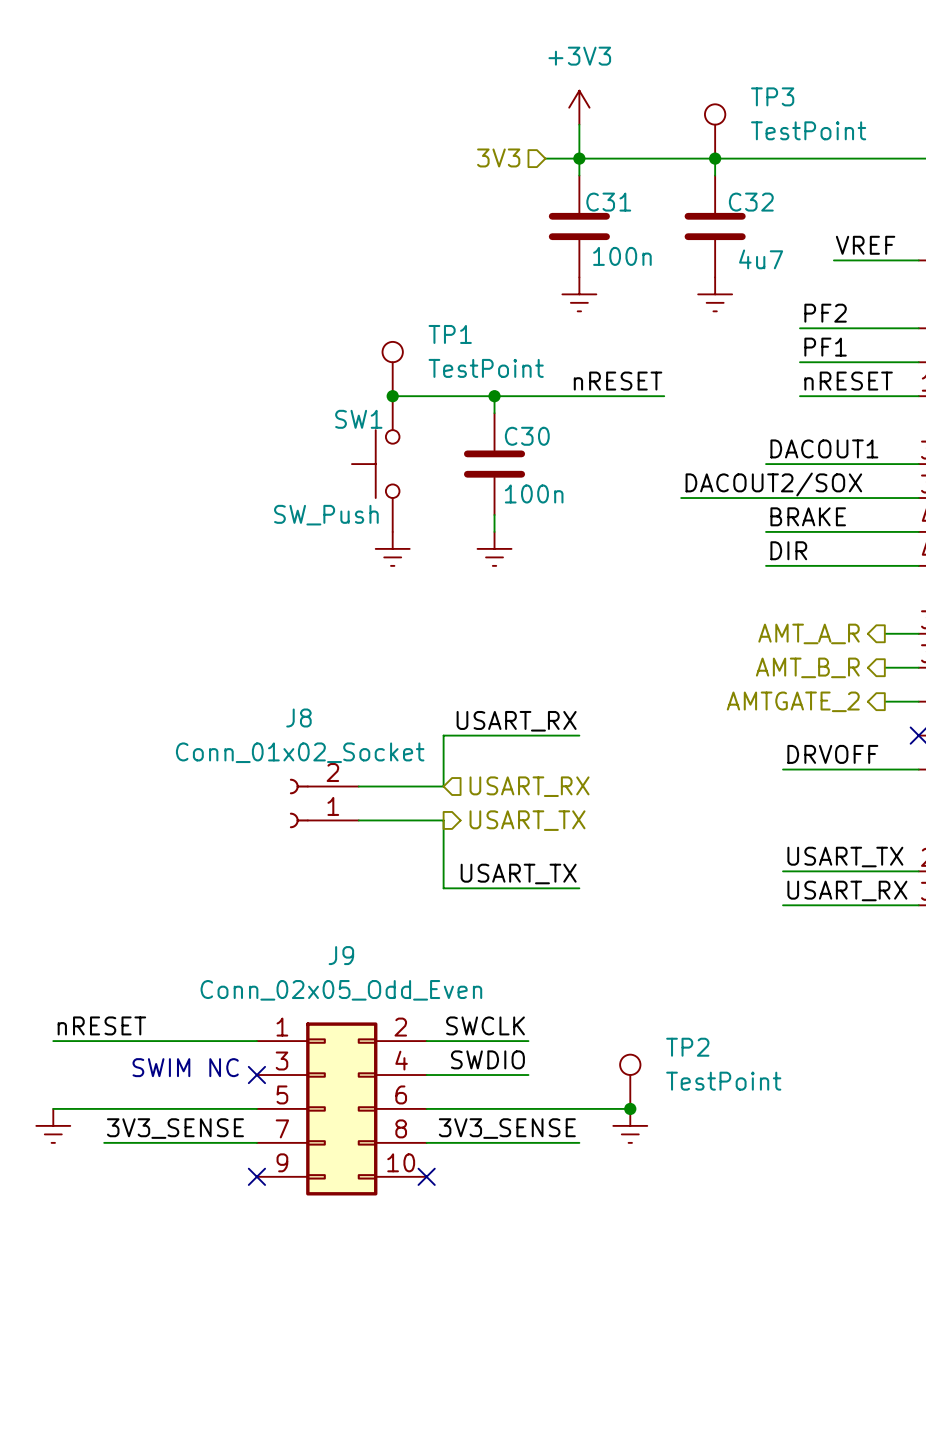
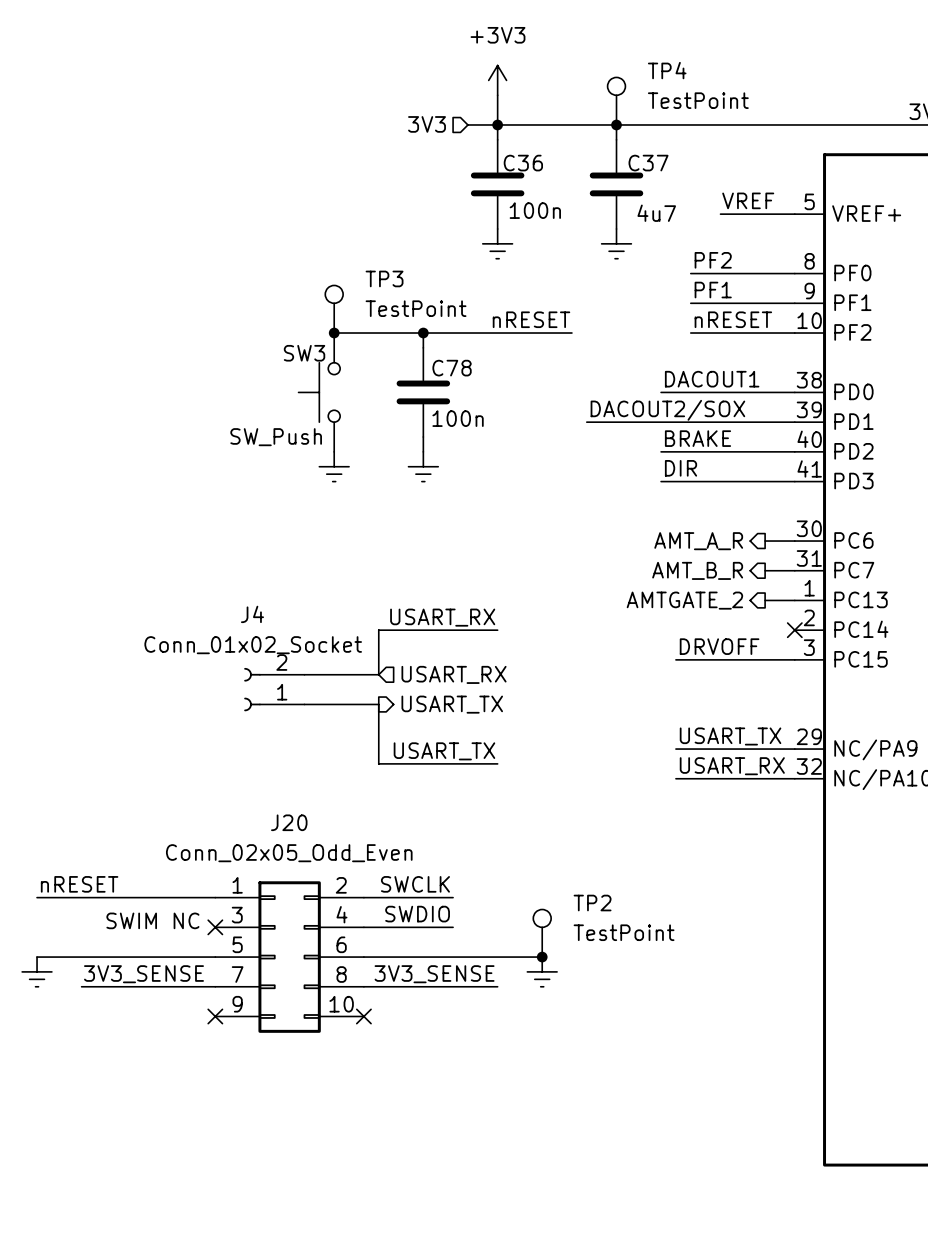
TP3 name: TP3 (772, 96) -> TP4 (667, 70)
C31 name: C31 (608, 202) -> C36 (523, 163)
C32 name: C32 (751, 202) -> C37 (648, 163)
TP1 name: TP1 (450, 334) -> TP3 (384, 278)
SW1 name: SW1 (358, 419) -> SW3 (304, 353)
C30 name: C30 (527, 436) -> C78 (452, 368)
J8 name: J8 (298, 717) -> J4 (252, 614)
J9 name: J9 (341, 955) -> J20 (289, 822)

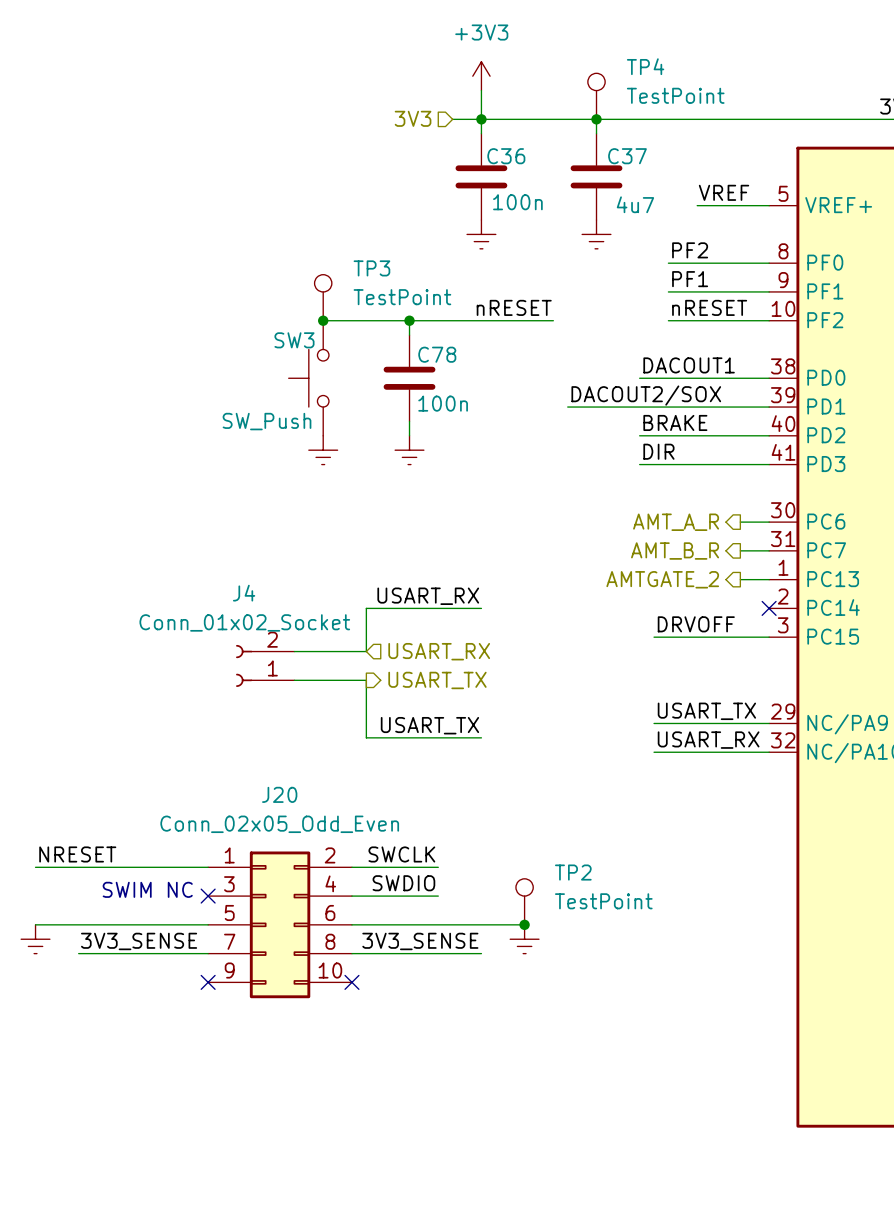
label: nRESET (79, 884) -> NRESET (77, 854)

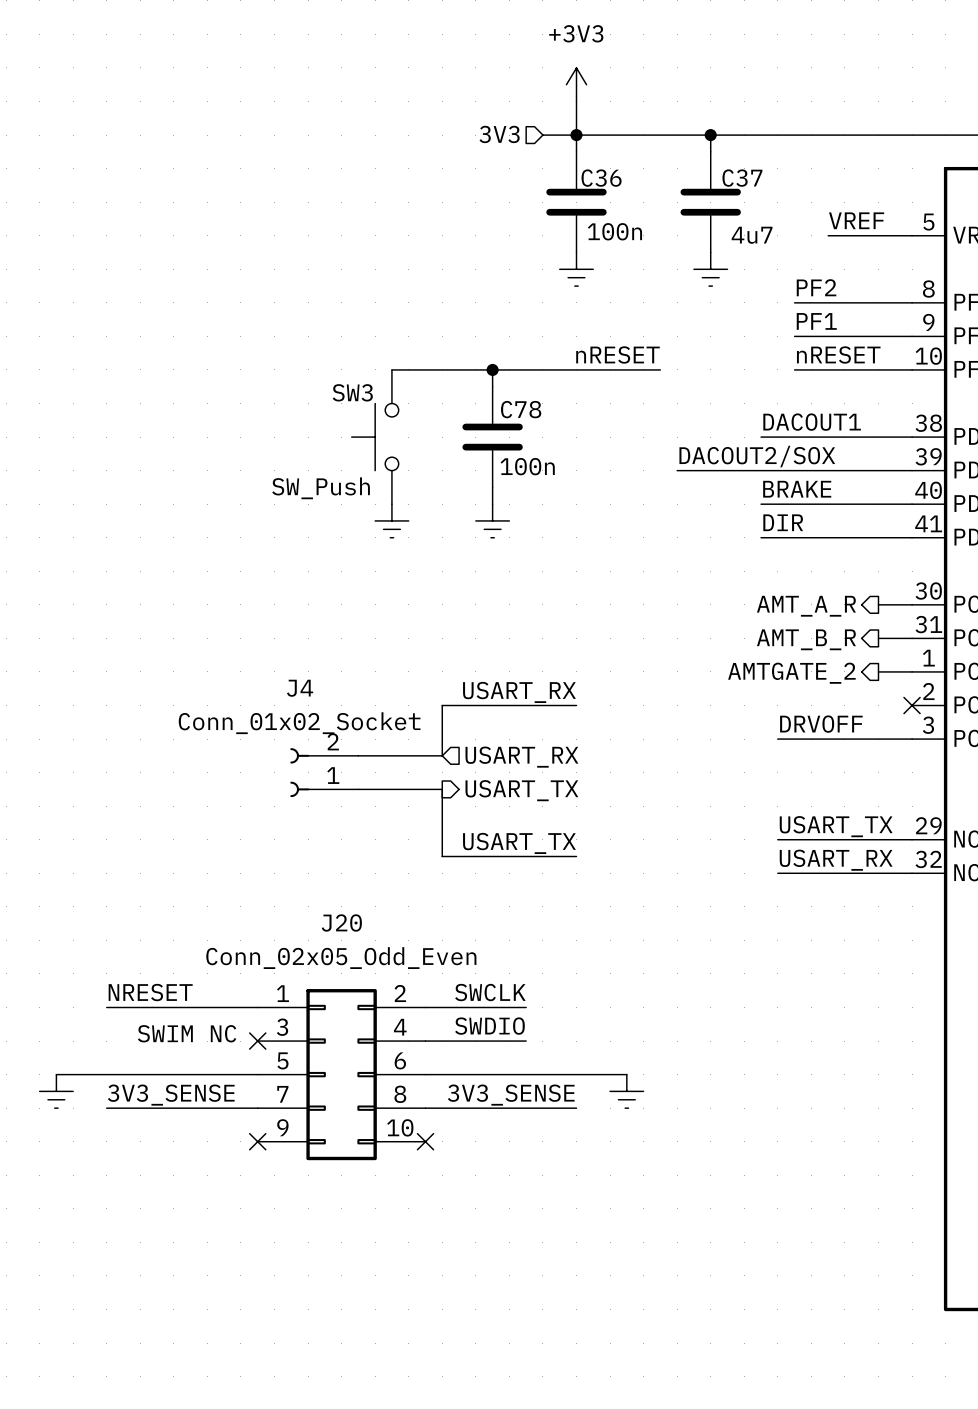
TP4: TestPoint (596, 96) -> none
TP3: TestPoint (323, 297) -> none
junction: (323, 320) -> none
label position: NRESET (77, 854) -> NRESET (150, 992)
wire: (35, 867) (78, 867) -> none
TP2: TestPoint (524, 901) -> none
junction: (524, 924) -> none

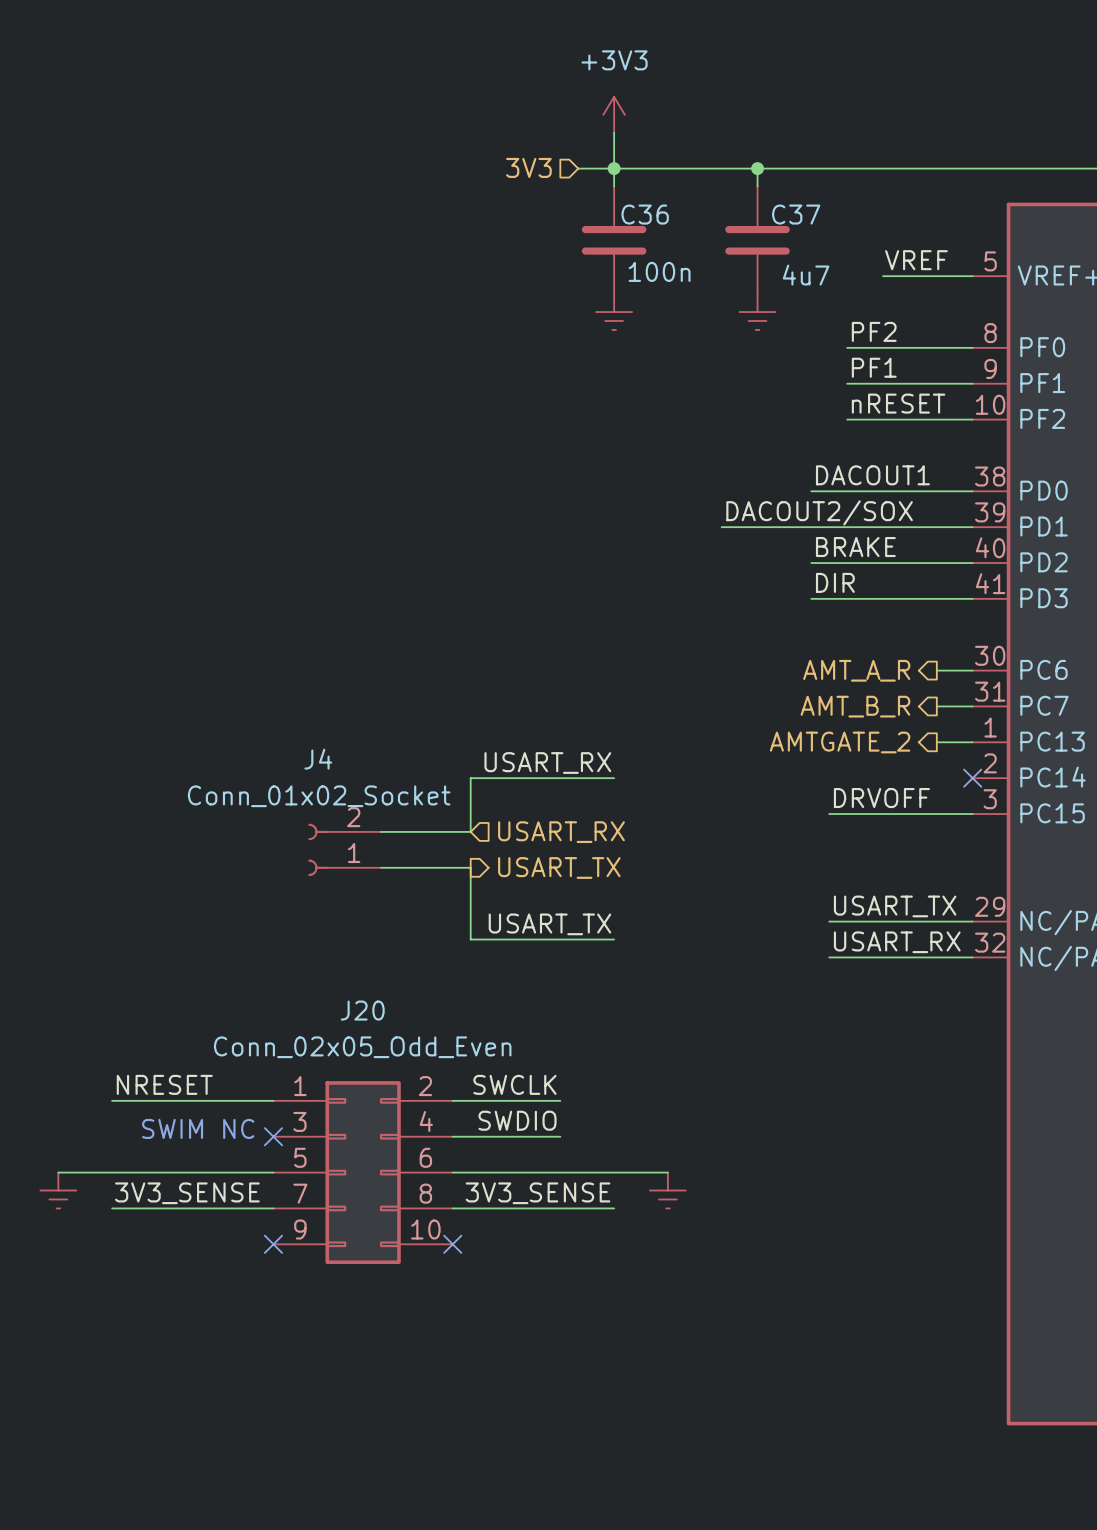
label: nRESET (617, 354) -> none
wire: (391, 369) (660, 369) -> none
wire: (492, 369) (492, 386) -> none
junction: (492, 369) -> none
SW3: SW_Push (375, 437) -> none
C78: 100n (492, 437) -> none
wire: (492, 487) (492, 504) -> none
power symbol: (391, 520) -> none
power symbol: (492, 520) -> none

